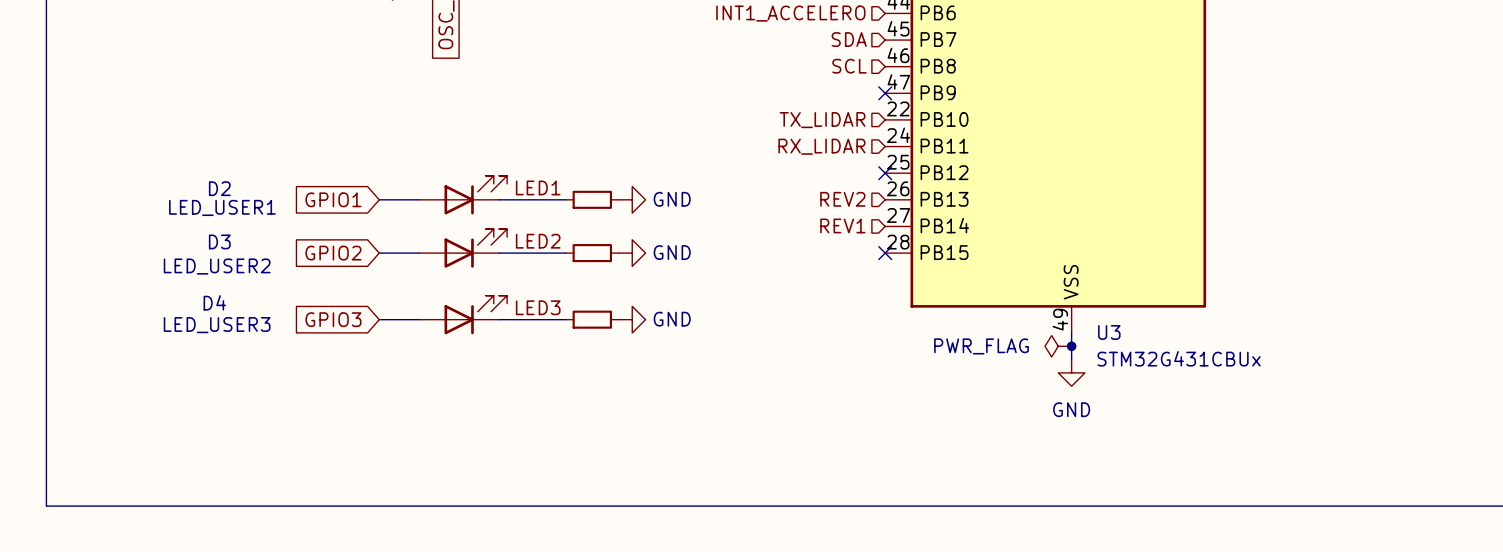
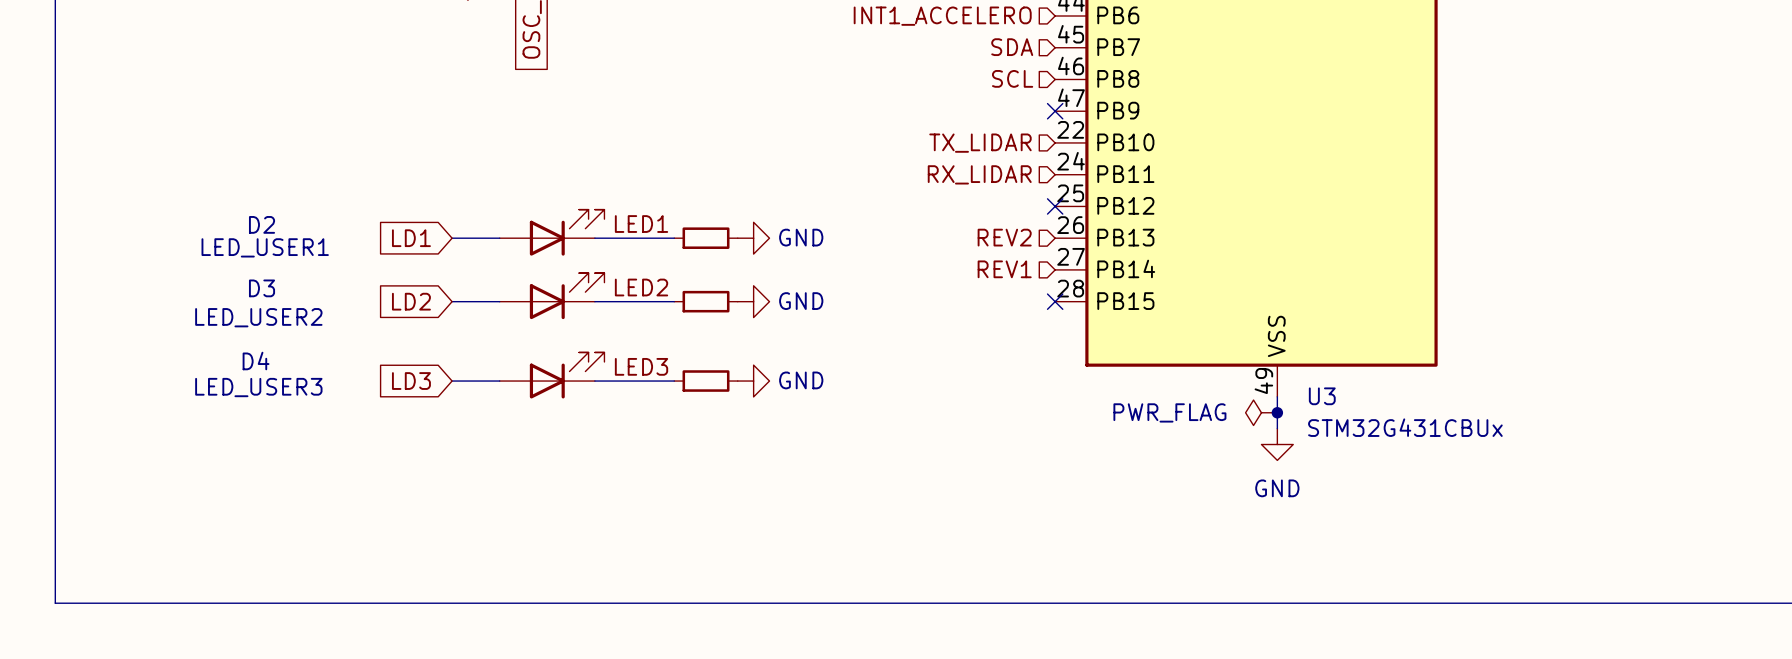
global label: GPIO1 (333, 199) -> LD1 (411, 238)
global label: GPIO2 (333, 253) -> LD2 (411, 301)
global label: GPIO3 (333, 319) -> LD3 (411, 381)

